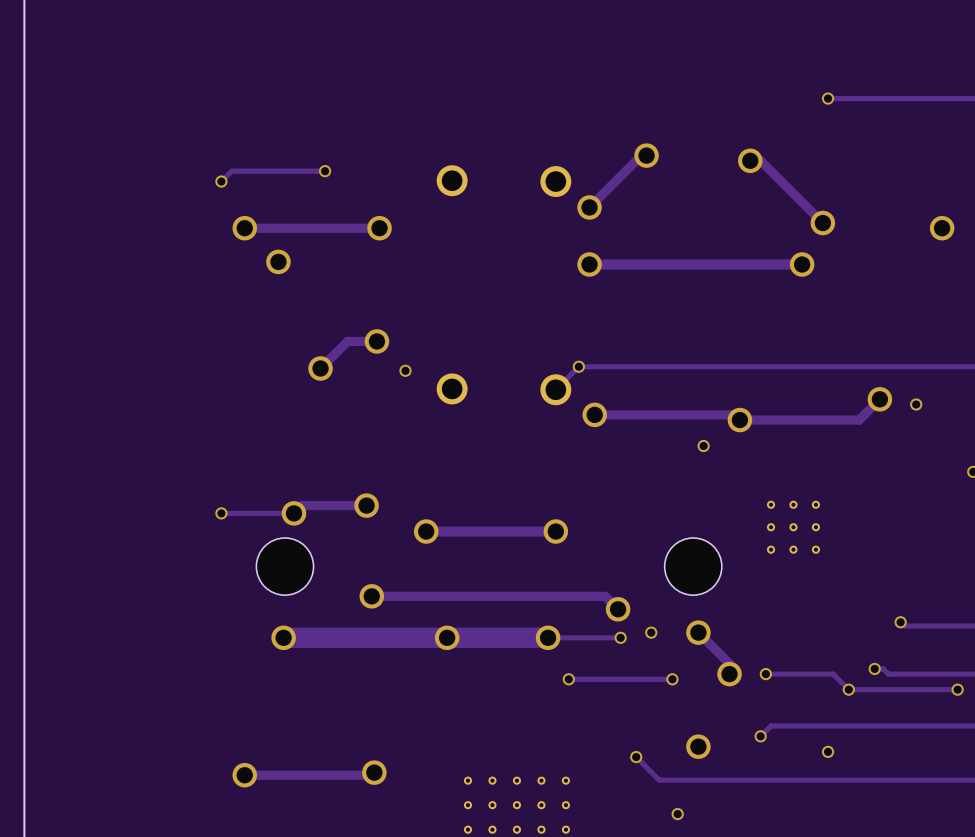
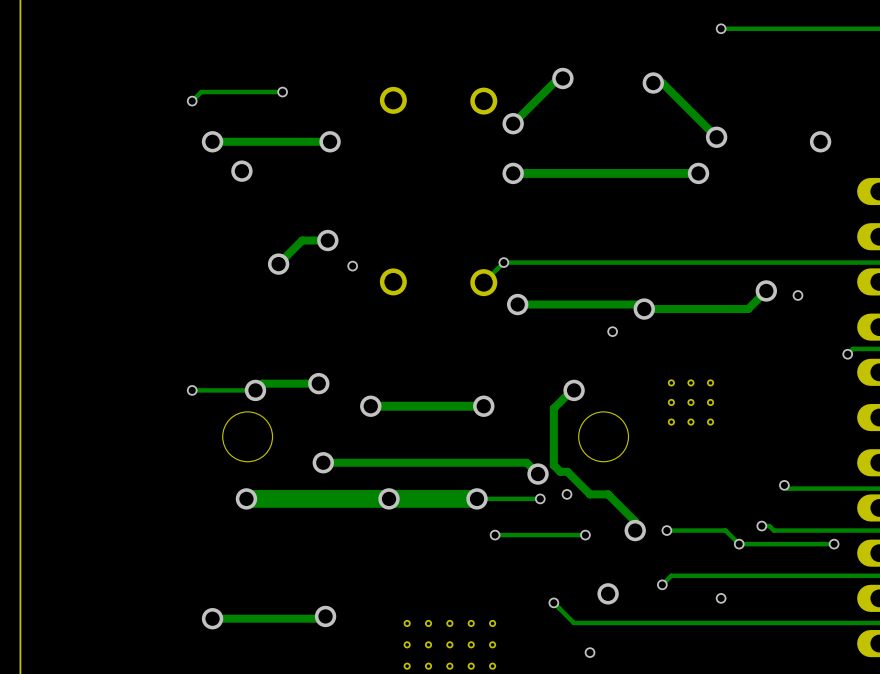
track: none -> (574, 390) (553, 408) (553, 465) (560, 471) (567, 471) (590, 494) (608, 494)
via: none -> (574, 390)
via: (698, 632) -> none

